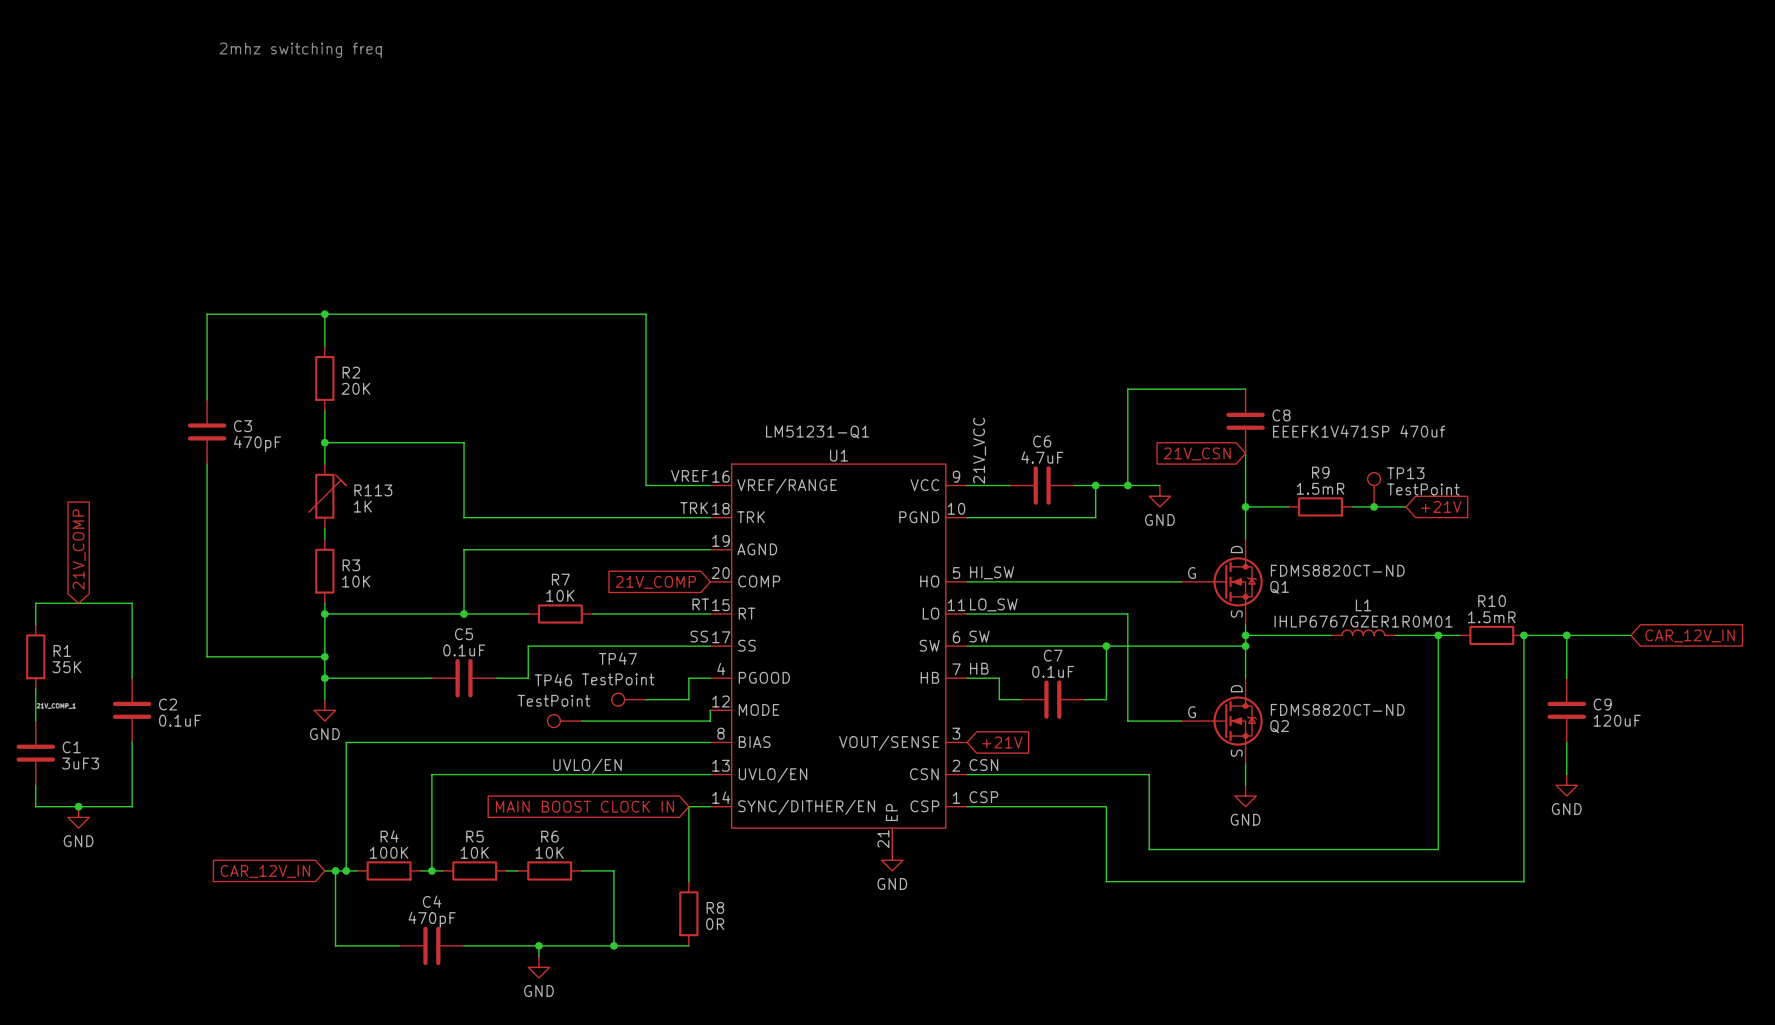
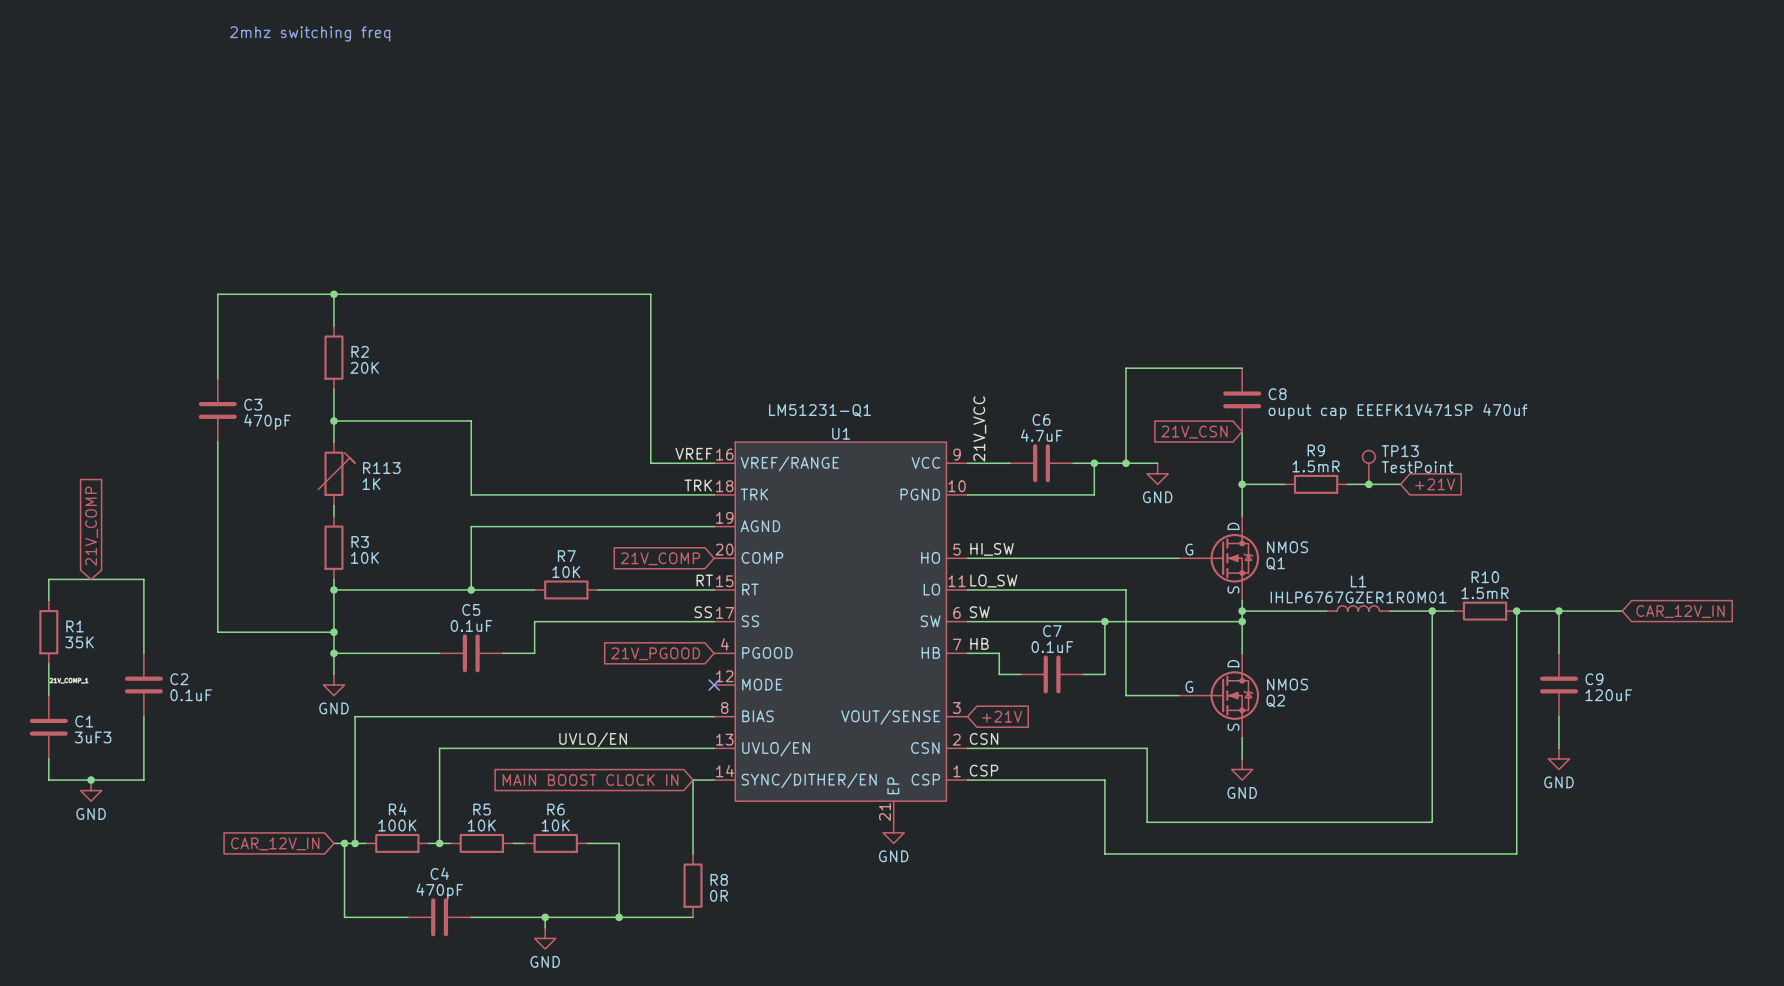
C8 value: EEEFK1V471SP 470uf (1358, 431) -> ouput cap EEEFK1V471SP 470uf (1398, 411)
Q1 value: FDMS8820CT-ND (1337, 570) -> NMOS (1287, 547)
global label: none -> 21V_PGOOD (655, 653)
wire: (710, 678) (688, 678) (688, 699) (646, 699) -> none
TP47: TestPoint (628, 699) -> none
Q2 value: FDMS8820CT-ND (1337, 709) -> NMOS (1287, 684)
wire: (710, 710) (710, 721) (581, 721) -> none
no-connect mark: none -> (714, 685)
TP46: TestPoint (564, 721) -> none

